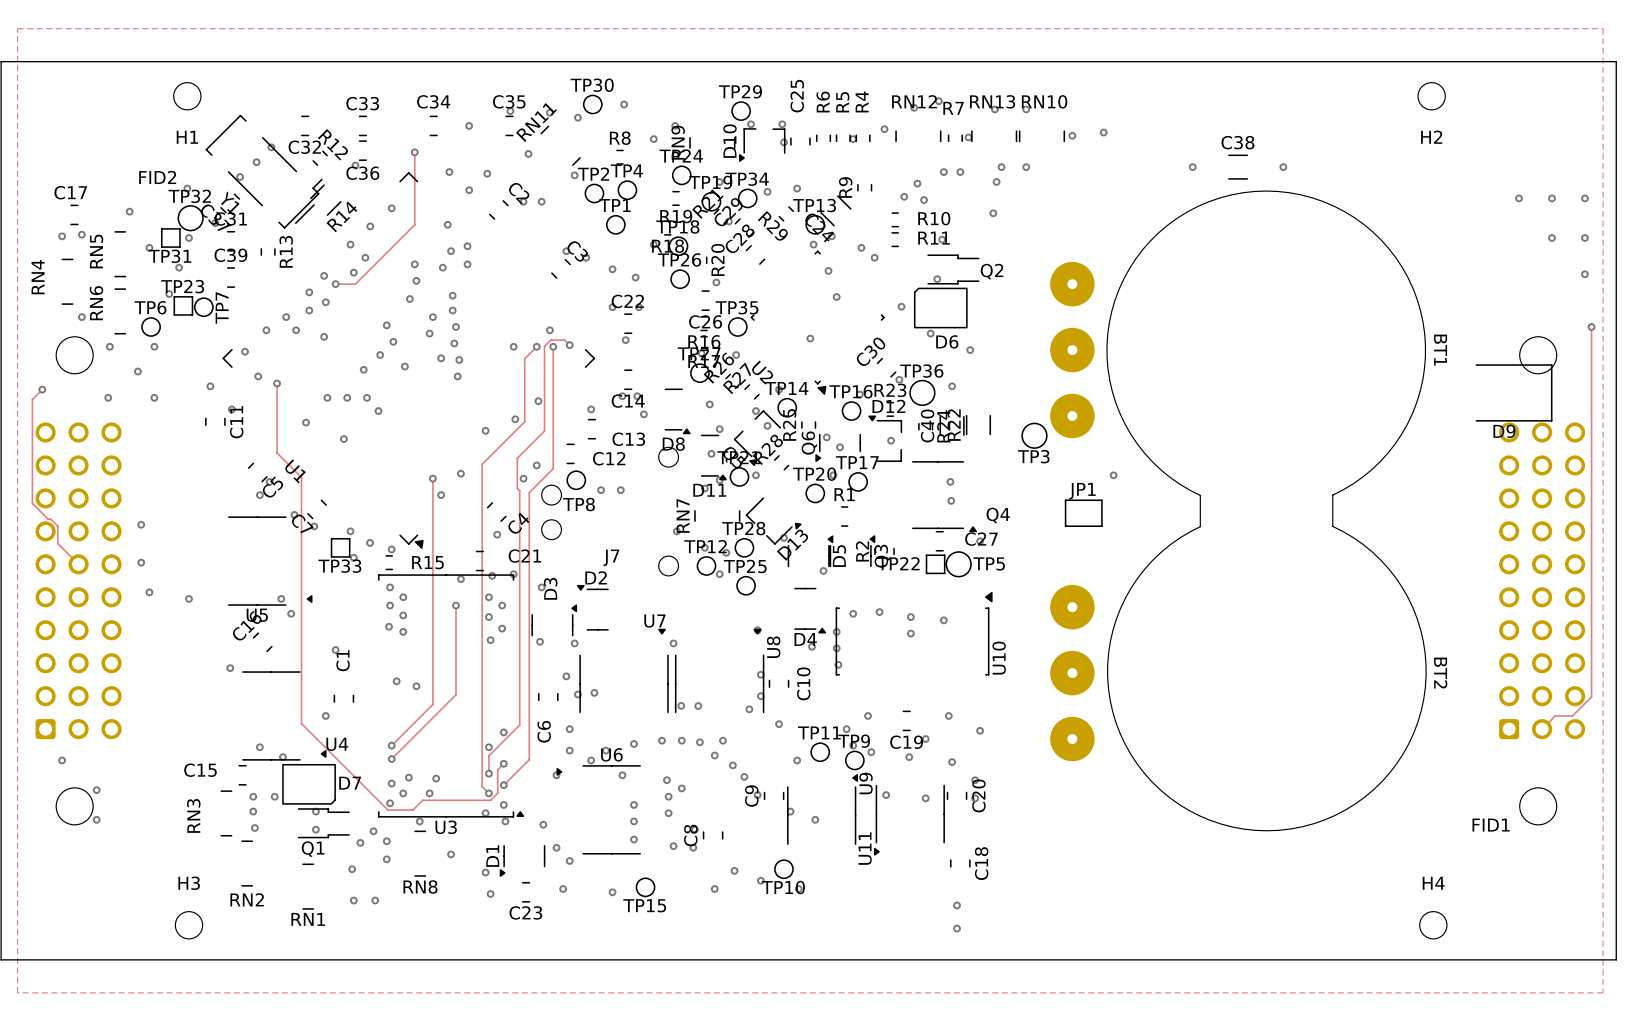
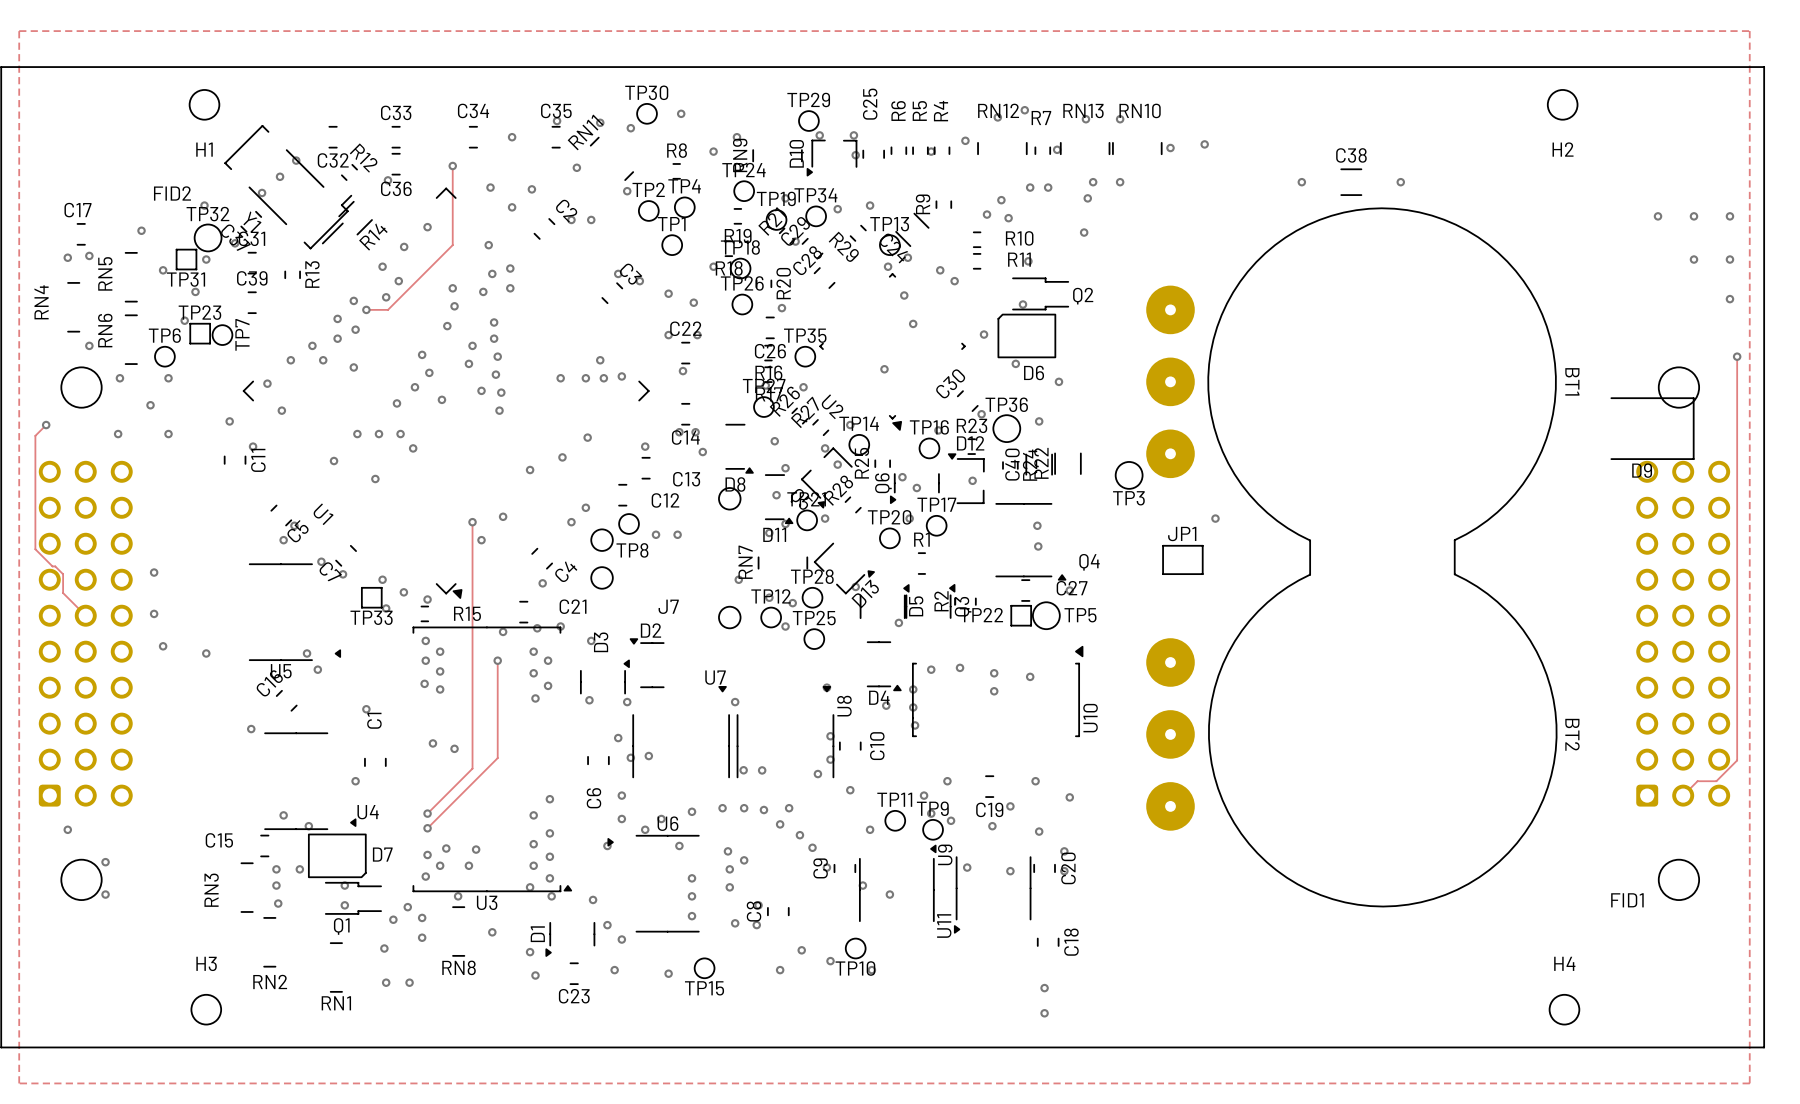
track: (569, 345) (564, 340) (550, 340) (544, 346) (544, 431) (517, 458) (517, 488) (519, 490) (519, 725) (488, 755) (488, 773) -> none
track: (536, 346) (524, 358) (524, 421) (482, 464) (482, 786) (488, 793) -> none
track: (553, 346) (553, 468) (529, 492) (529, 759) (503, 785) -> none
track: (277, 383) (277, 452) (301, 477) (301, 723) (387, 810) (412, 810) (422, 800) (490, 800) (497, 793) (497, 769) (503, 763) -> none
via: (277, 383) -> none

